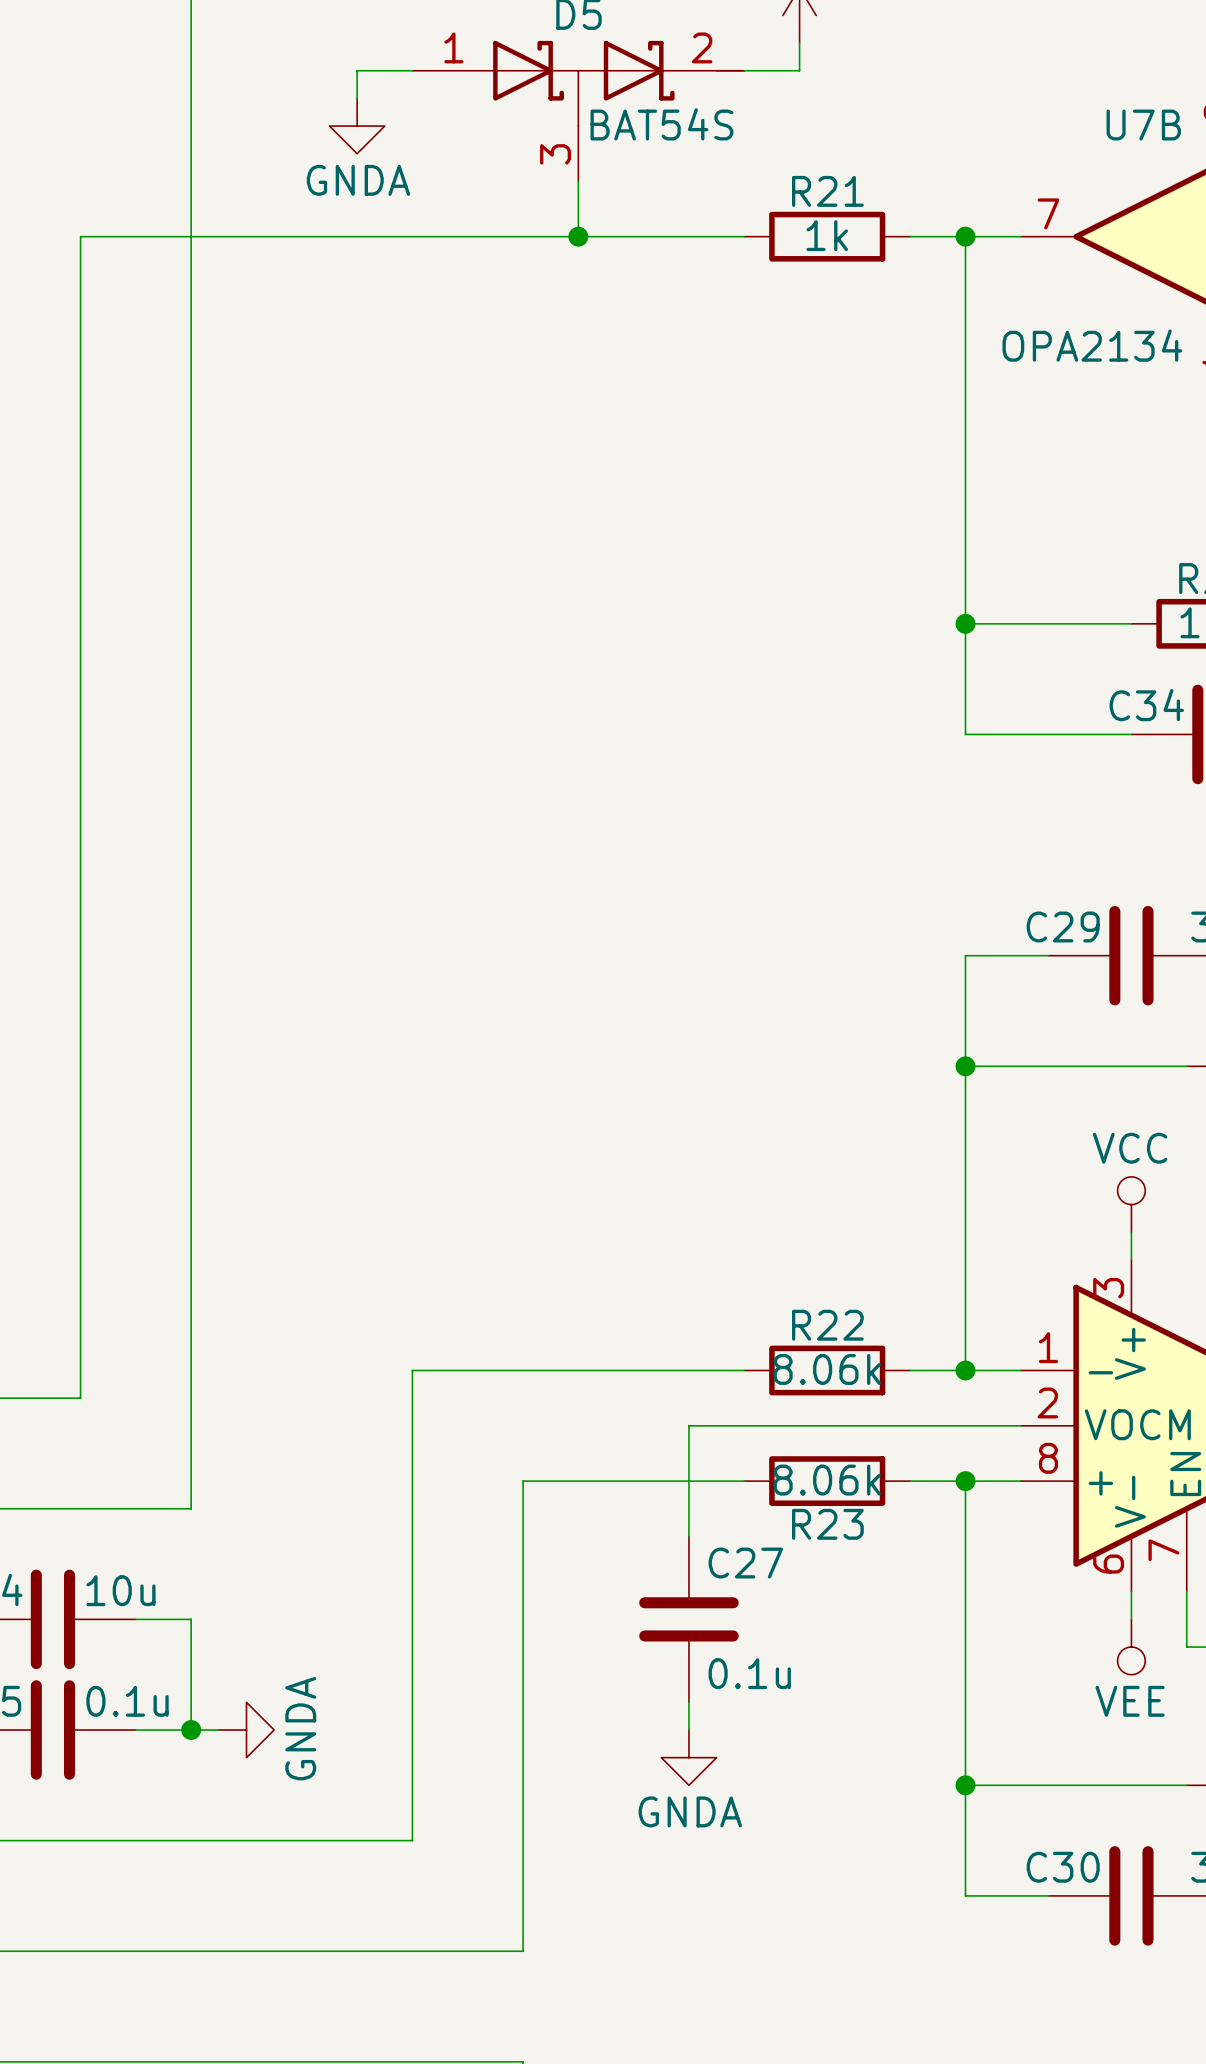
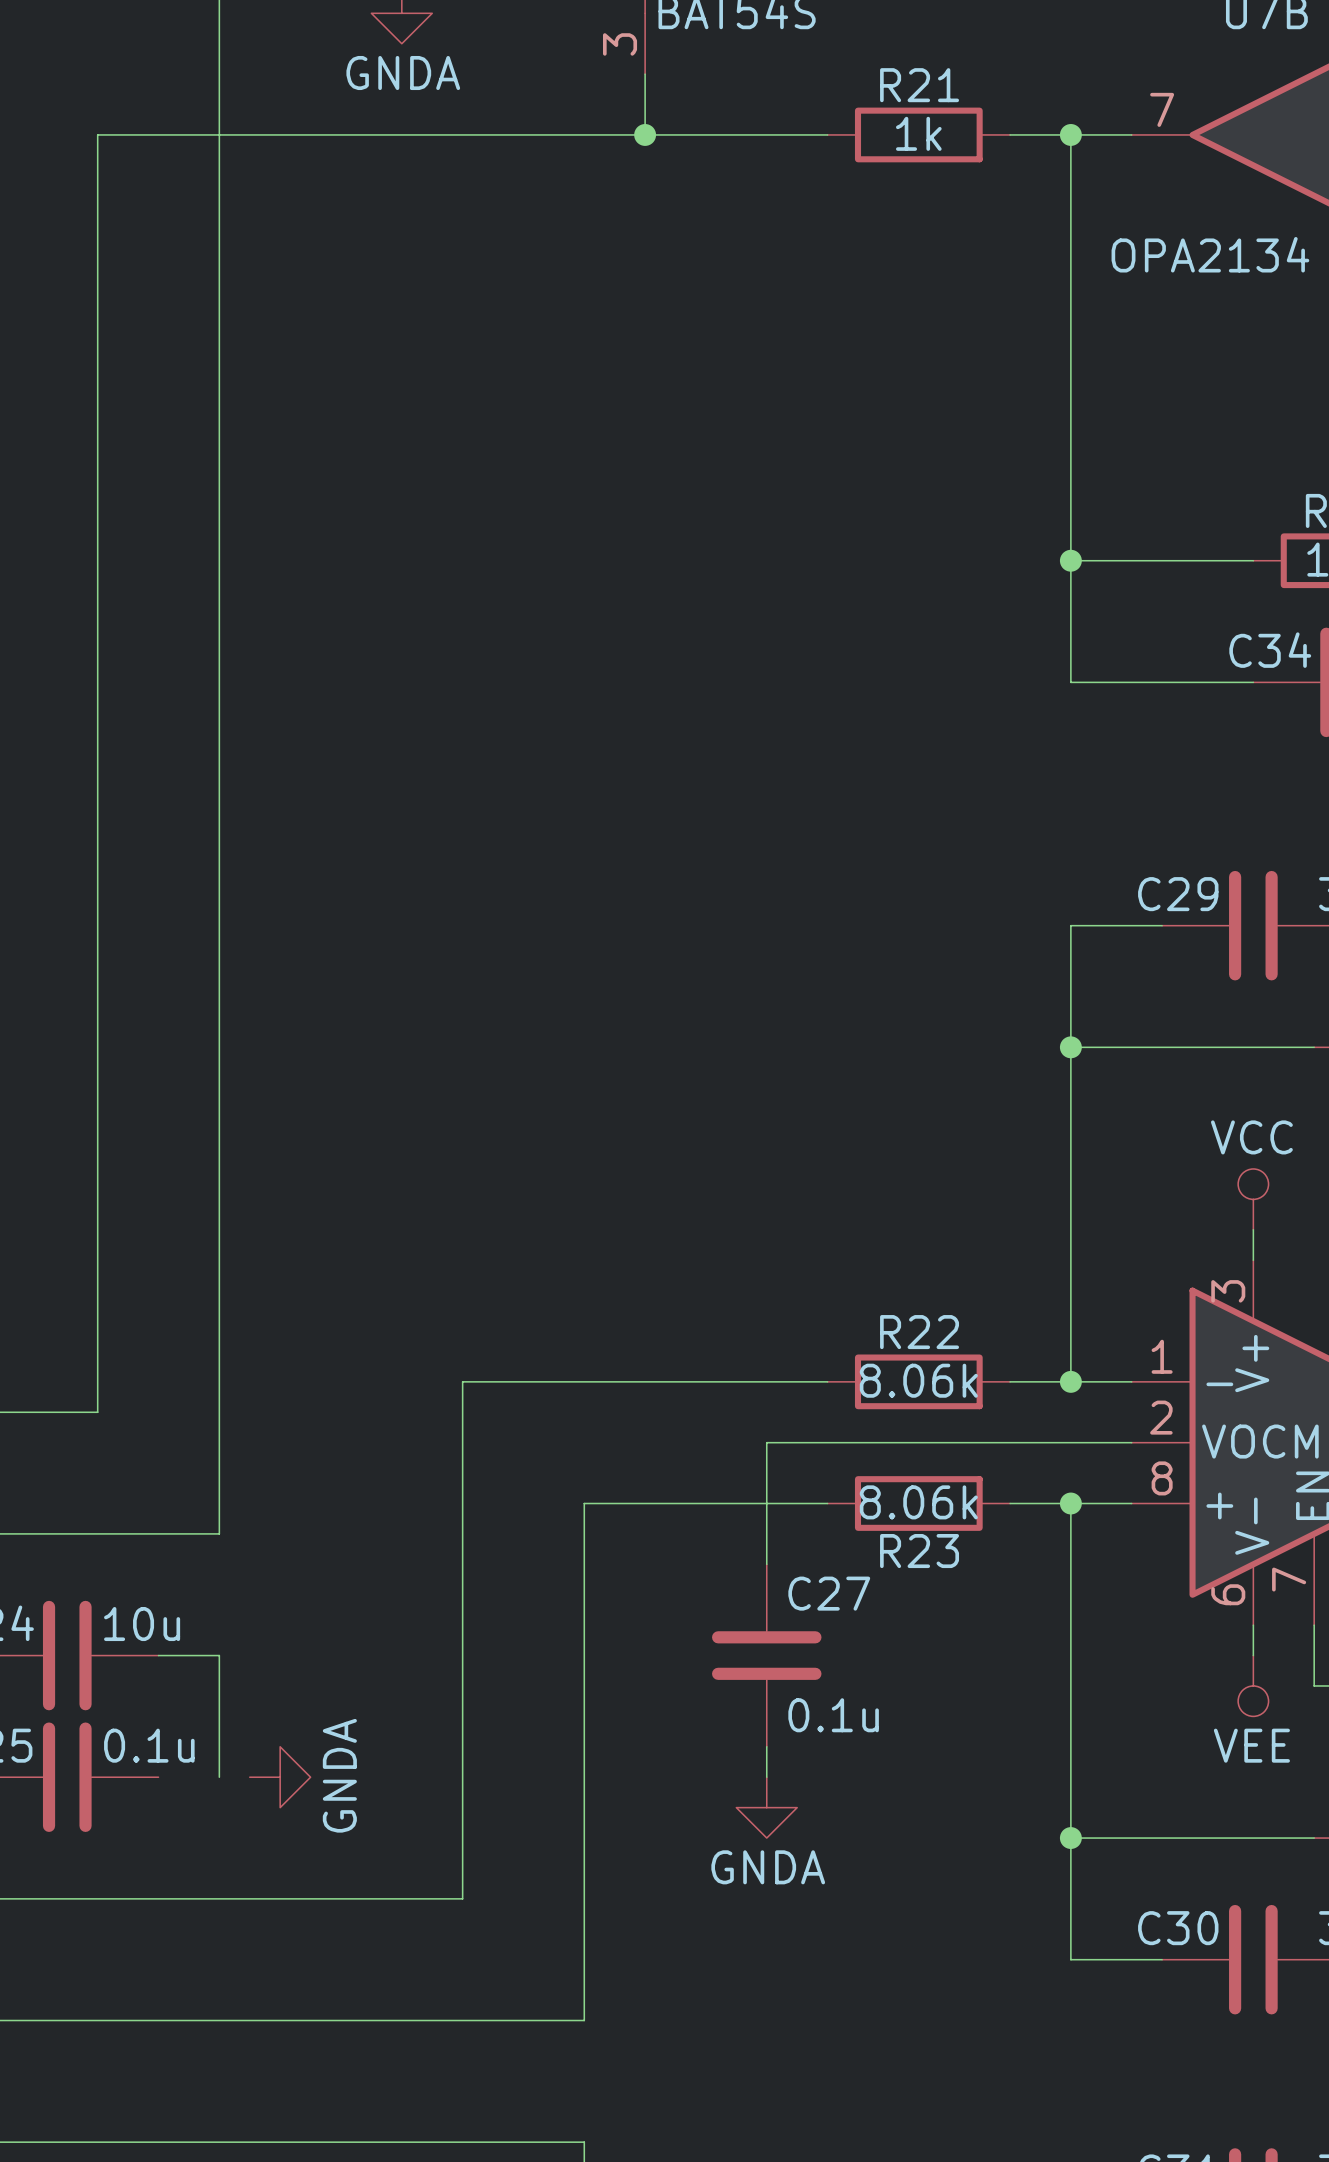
wire: (135, 1730) (218, 1730) -> none
junction: (191, 1730) -> none

